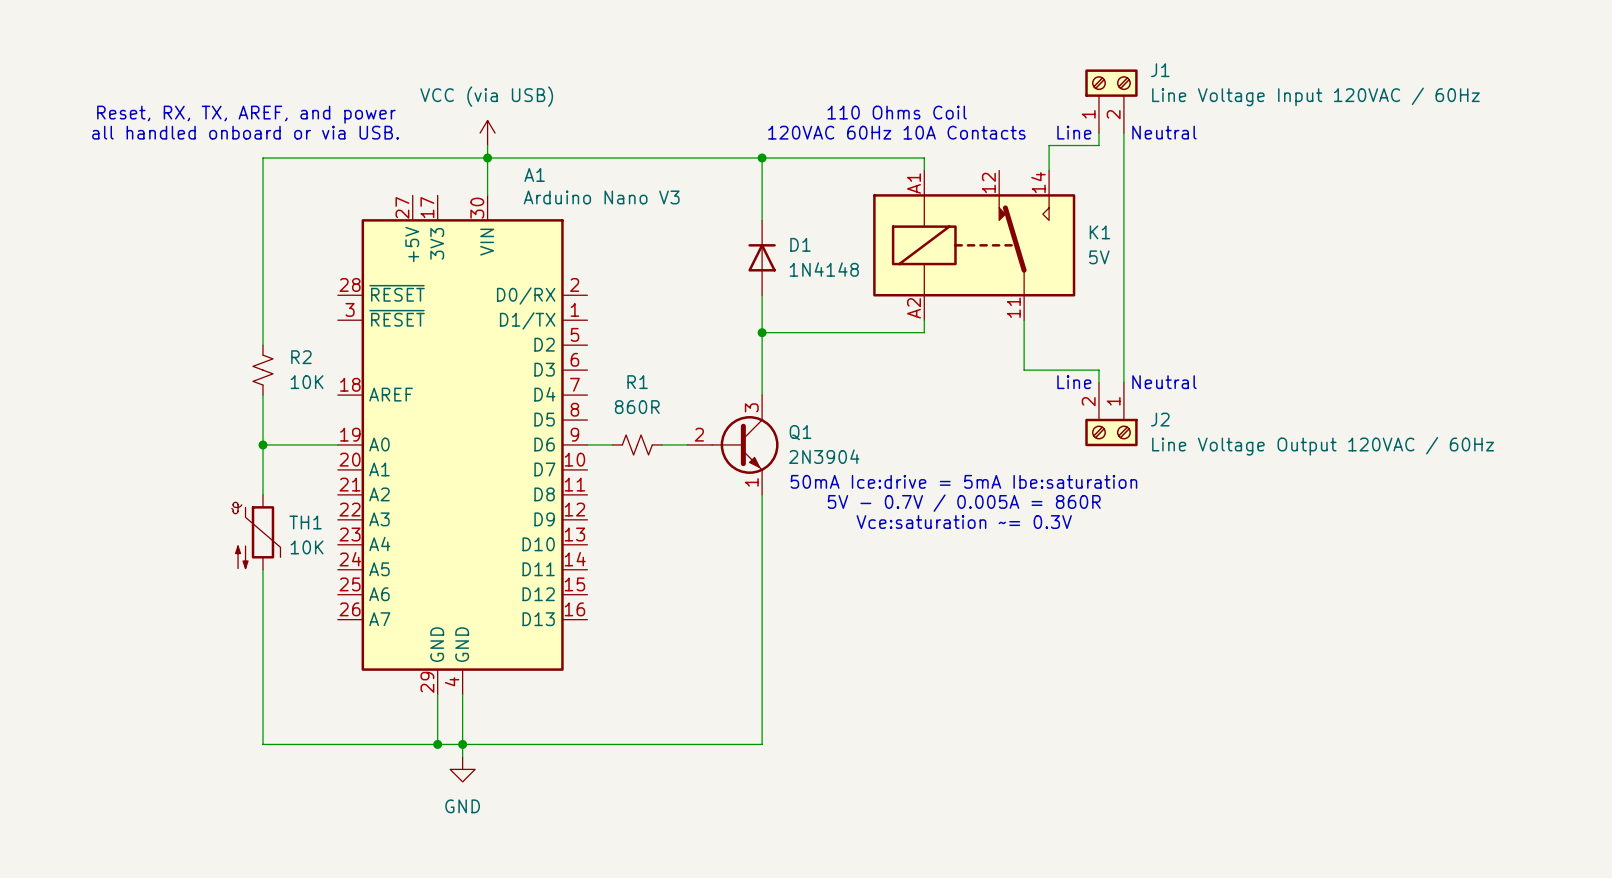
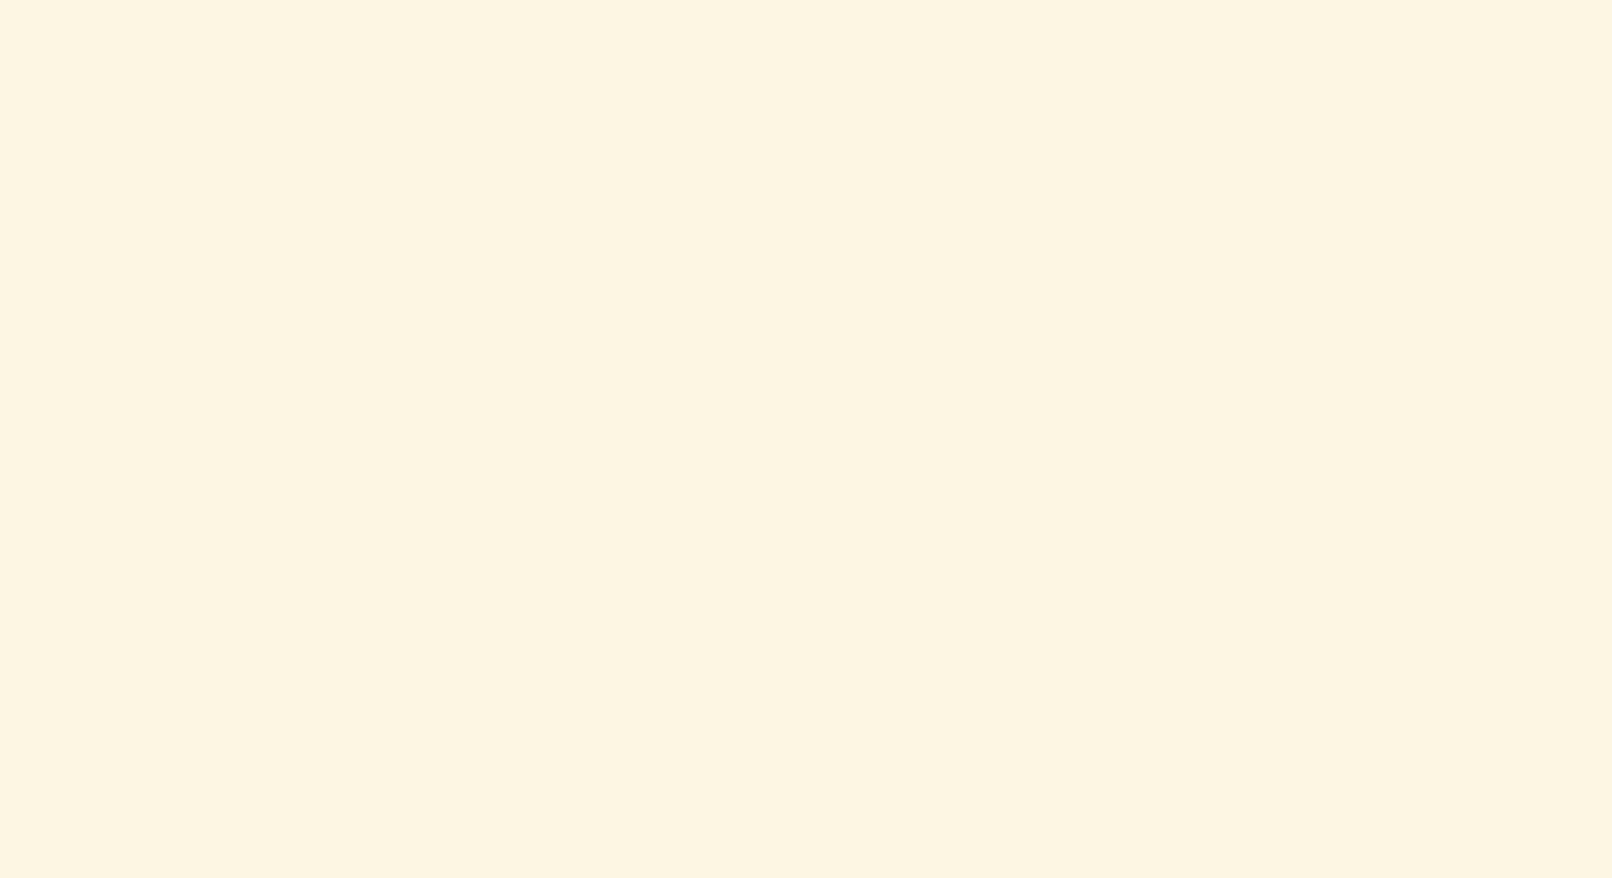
J1: Line Voltage Input 120VAC / 60Hz (1111, 101) -> none
text: 110 Ohms Coil (897, 112) -> none
text: Reset, RX, TX, AREF, and power (246, 114) -> none
text: all handled onboard or via USB. (245, 132) -> none
text: 120VAC 60Hz 10A Contacts (896, 132) -> none
text: Line (1074, 132) -> none
text: Neutral (1164, 132) -> none
power symbol: VCC (via USB) (487, 133) -> none
wire: (1098, 133) (1098, 145) (1049, 145) (1049, 170) -> none
wire: (1123, 133) (1123, 382) -> none
wire: (487, 145) (487, 195) -> none
junction: (487, 158) -> none
wire: (762, 158) (762, 220) -> none
junction: (762, 158) -> none
wire: (924, 170) (924, 158) (262, 158) (262, 345) -> none
K1: 5V (974, 245) -> none
D1: 1N4148 (762, 257) -> none
wire: (762, 295) (762, 395) -> none
wire: (924, 320) (924, 332) (762, 332) -> none
wire: (1024, 320) (1024, 370) (1098, 370) (1098, 382) -> none
junction: (762, 332) -> none
R2: 10K (262, 370) -> none
text: Line (1074, 382) -> none
text: Neutral (1164, 382) -> none
wire: (262, 395) (262, 494) -> none
J2: Line Voltage Output 120VAC / 60Hz (1111, 414) -> none
wire: (262, 444) (337, 444) -> none
junction: (262, 444) -> none
A1: Arduino Nano V3 (462, 444) -> none
wire: (587, 444) (612, 444) -> none
R1: 860R (637, 444) -> none
wire: (662, 444) (687, 444) -> none
Q1: 2N3904 (732, 444) -> none
text: 50mA Ice:drive = 5mA Ibe:saturation (963, 481) -> none
wire: (762, 494) (762, 744) (262, 744) (262, 569) -> none
text: 5V - 0.7V / 0.005A = 860R (964, 503) -> none
text: Vce:saturation ~= 0.3V (964, 522) -> none
TH1: 10K (256, 532) -> none
wire: (437, 694) (437, 744) -> none
wire: (462, 694) (462, 756) -> none
junction: (437, 744) -> none
junction: (462, 744) -> none
power symbol: GND (462, 769) -> none

